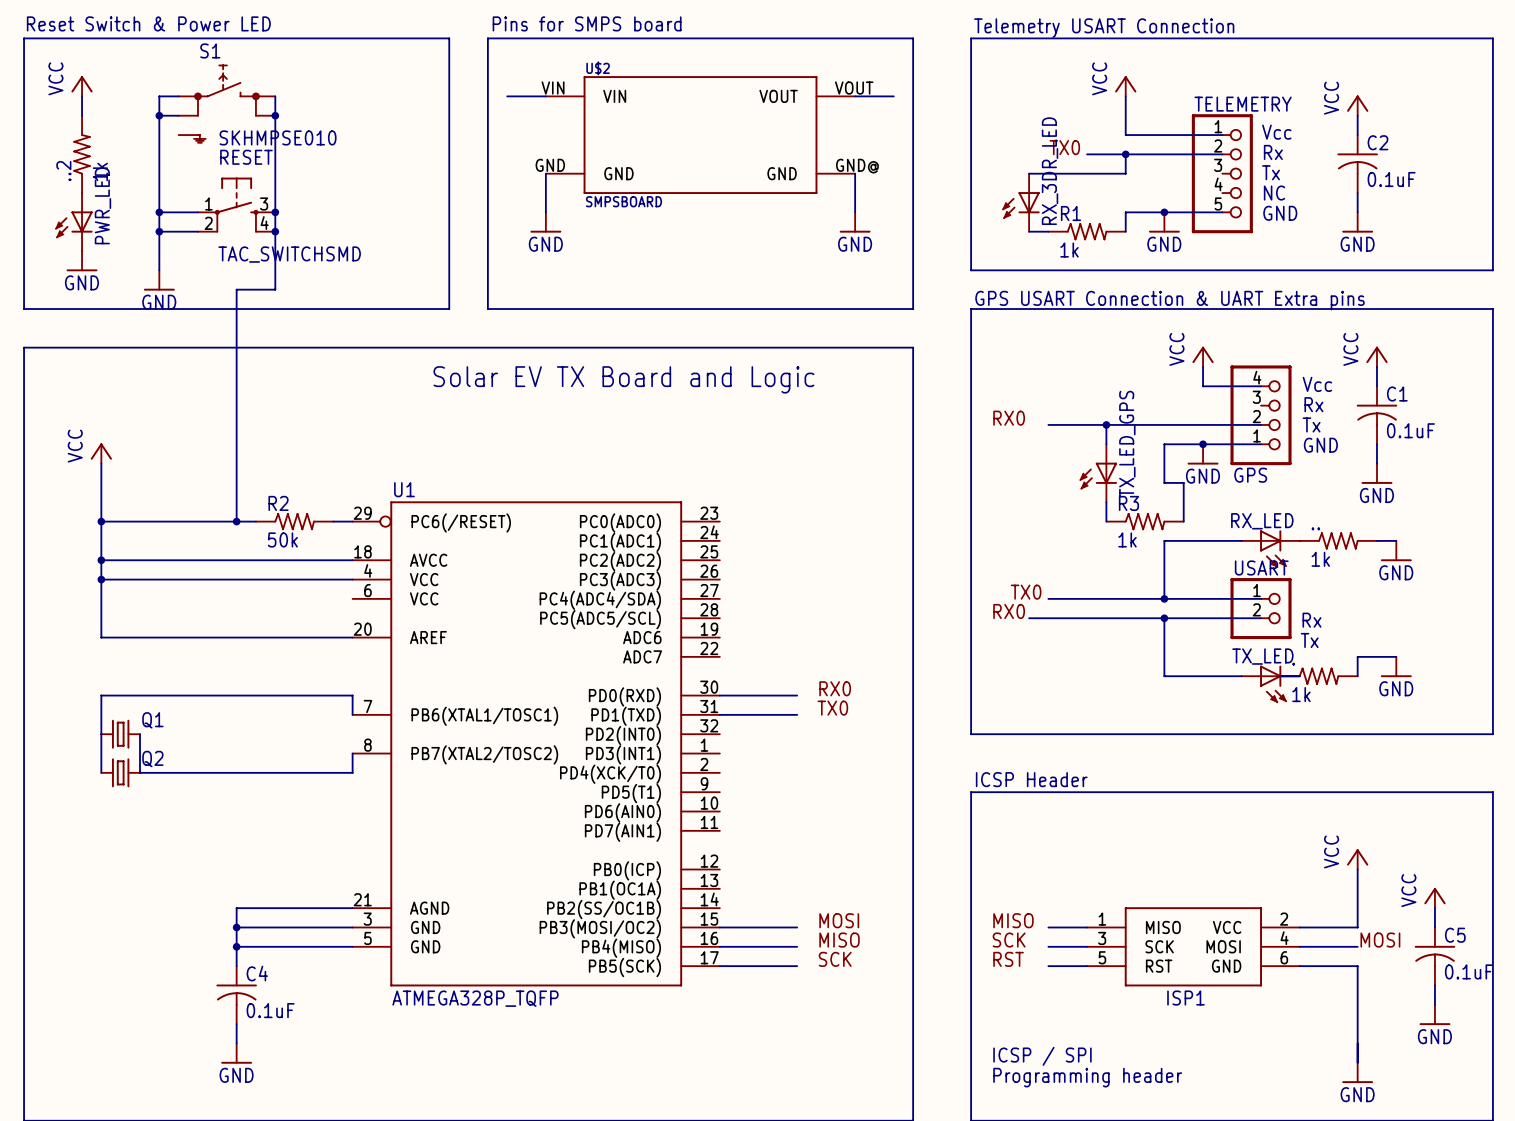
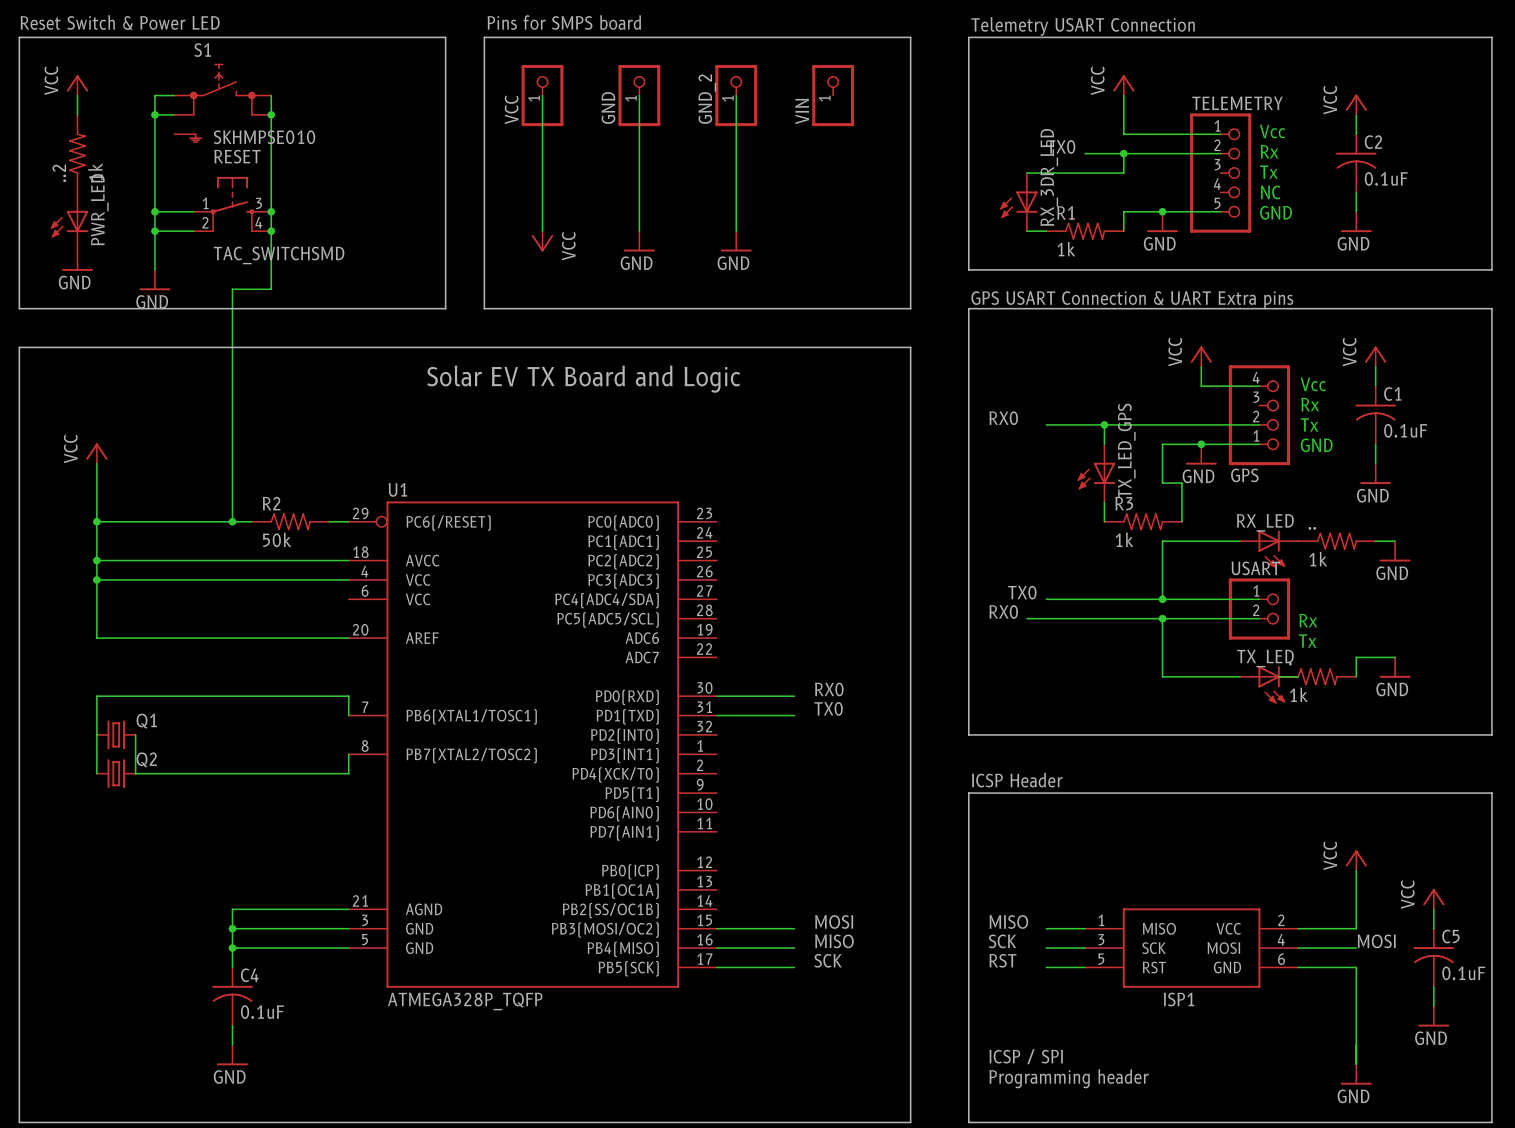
wire: (507, 96) (545, 96) -> (542, 173) (542, 95)
VCC: none -> (542, 95)
wire: none -> (639, 95) (639, 231)
GND: none -> (639, 95)
wire: none -> (736, 95) (736, 231)
GND_2: none -> (736, 95)
VIN: none -> (833, 95)
wire: (855, 96) (893, 96) -> none
U$2: SMPSBOARD (700, 135) -> none
wire: (855, 173) (855, 212) -> none
power symbol: GND (545, 222) -> none
power symbol: GND (855, 222) -> none
power symbol: none -> VCC (542, 241)
power symbol: none -> GND (639, 241)
power symbol: none -> GND (736, 241)

